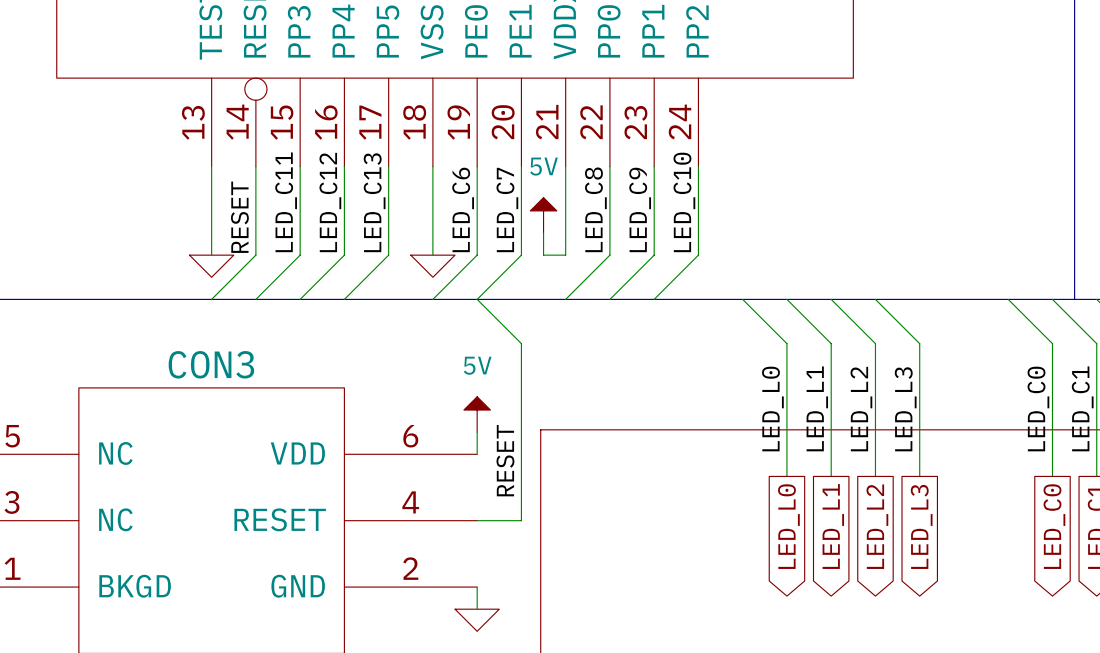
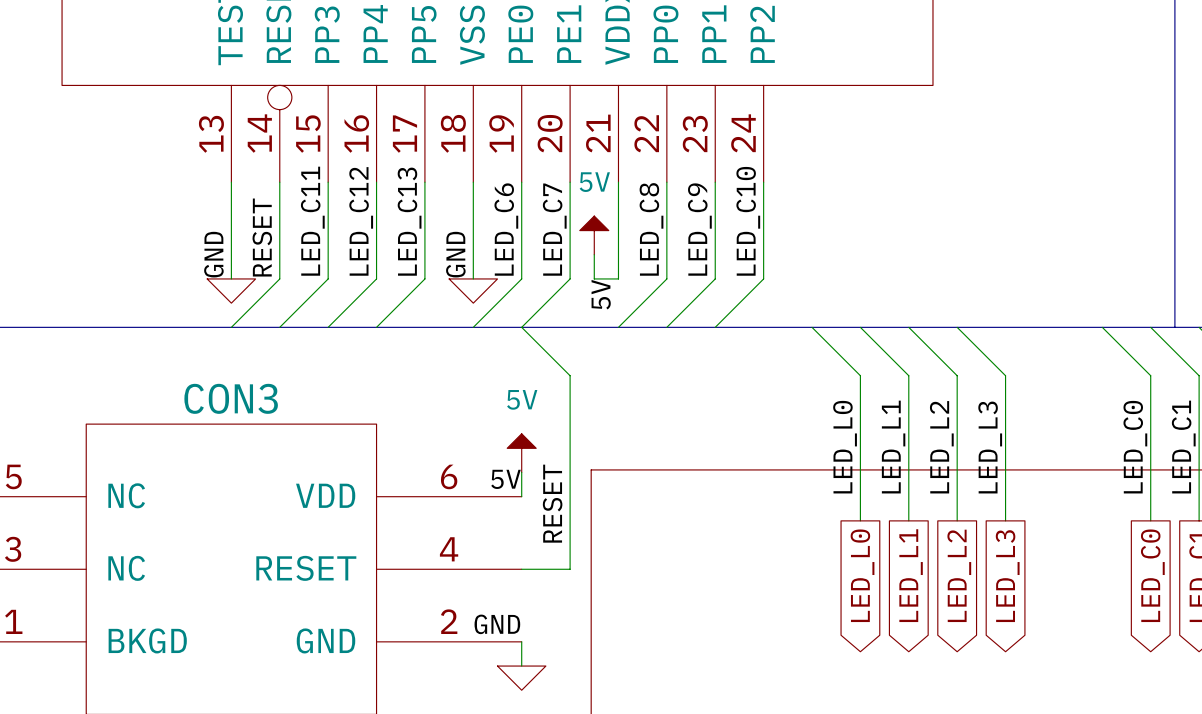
label: none -> GND (213, 254)
label: none -> GND (455, 254)
label: none -> 5V (601, 294)
label: none -> 5V (505, 479)
label: none -> GND (497, 624)

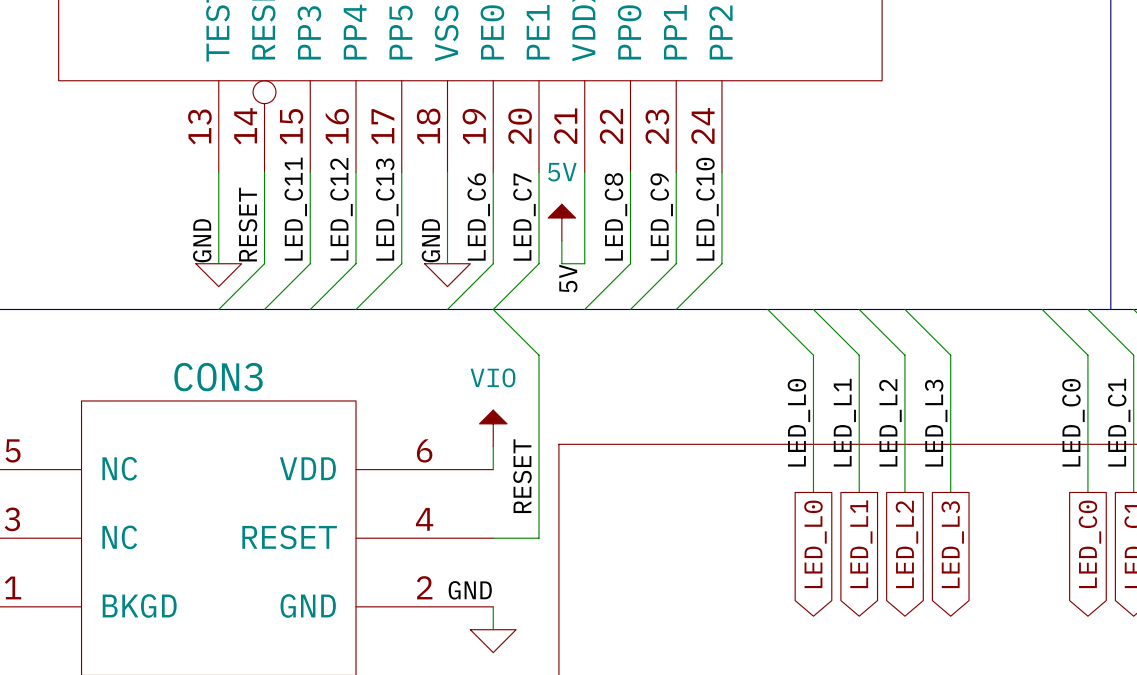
power symbol: 5V (521, 453) -> VIO (493, 428)
label: 5V (505, 479) -> none

